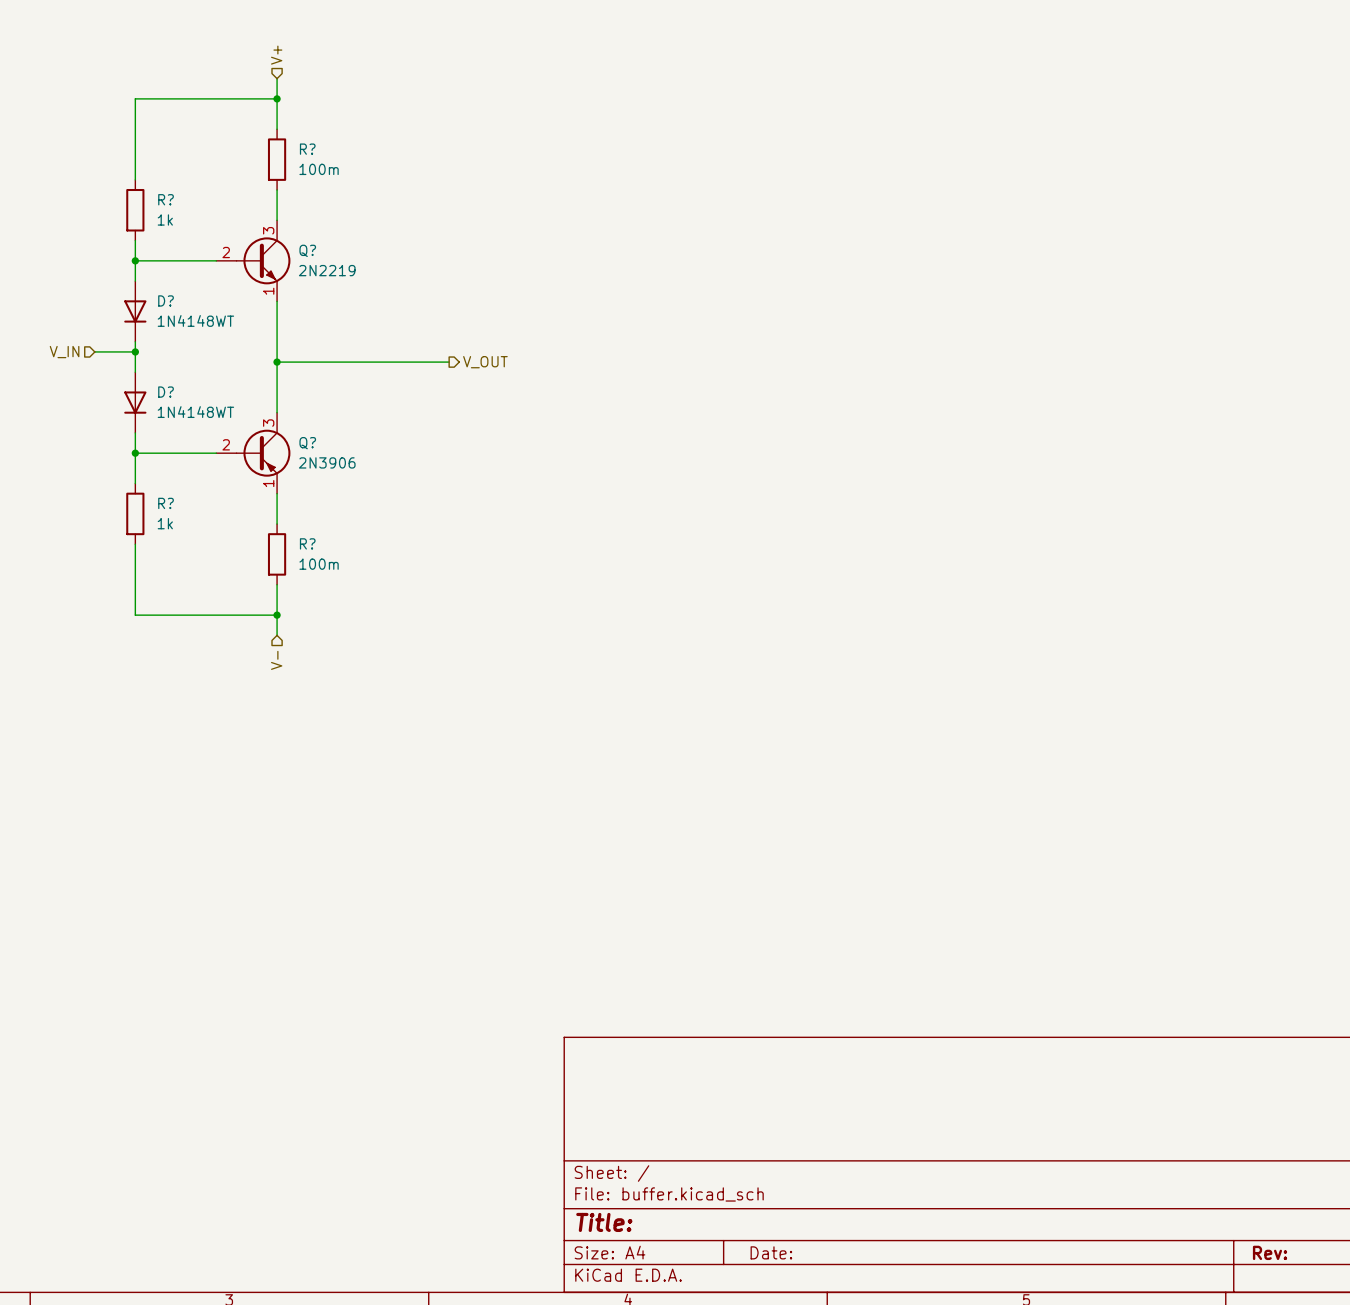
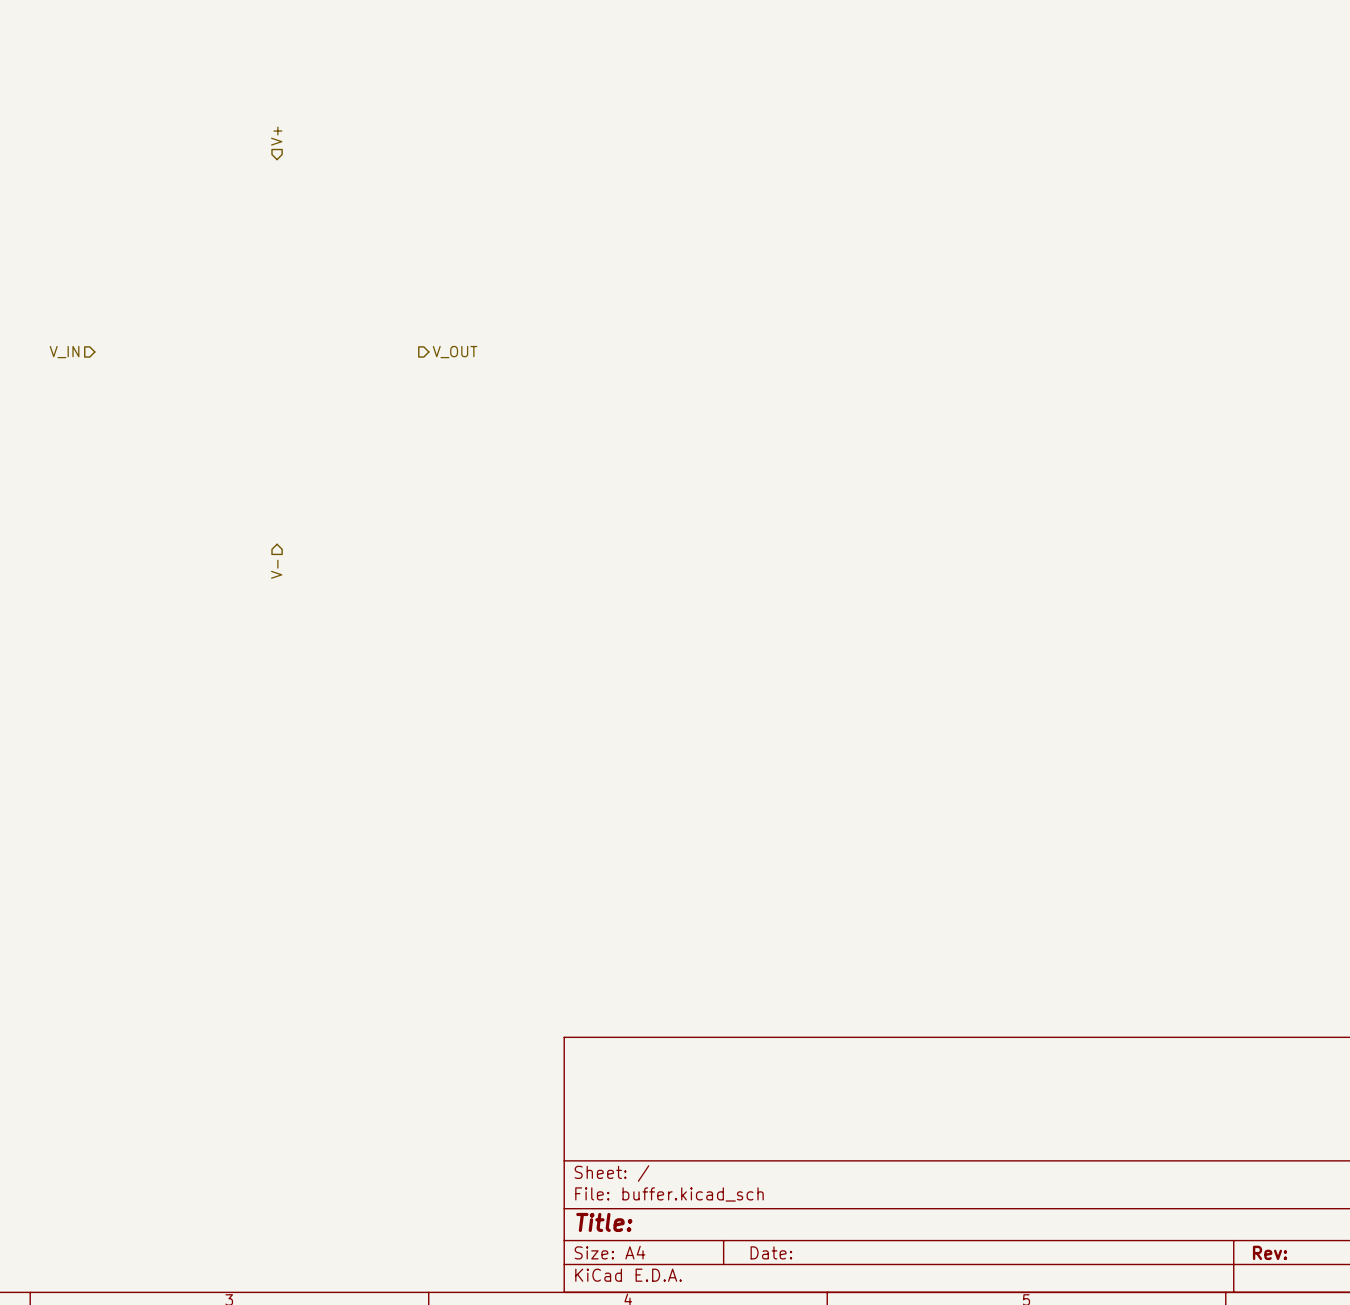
hierarchical label position: V+ (276, 55) -> V+ (276, 136)
wire: (277, 78) (277, 129) -> none
wire: (277, 98) (135, 98) (135, 179) -> none
junction: (277, 98) -> none
R?: 100m (277, 159) -> none
wire: (277, 190) (277, 220) -> none
R?: 1k (135, 210) -> none
wire: (135, 240) (135, 281) -> none
wire: (135, 260) (216, 260) -> none
junction: (135, 260) -> none
Q?: 2N2219 (253, 260) -> none
wire: (277, 301) (277, 412) -> none
D?: 1N4148WT (135, 311) -> none
wire: (135, 341) (135, 372) -> none
wire: (94, 351) (135, 351) -> none
junction: (135, 351) -> none
wire: (277, 362) (449, 362) -> none
junction: (277, 362) -> none
hierarchical label position: V_OUT (485, 362) -> V_OUT (455, 352)
D?: 1N4148WT (135, 402) -> none
wire: (135, 432) (135, 483) -> none
wire: (135, 453) (216, 453) -> none
junction: (135, 453) -> none
Q?: 2N3906 (253, 453) -> none
wire: (277, 493) (277, 524) -> none
R?: 1k (135, 513) -> none
wire: (135, 544) (135, 615) (277, 615) -> none
R?: 100m (277, 554) -> none
wire: (277, 584) (277, 635) -> none
junction: (277, 615) -> none
hierarchical label position: V- (276, 660) -> V- (276, 569)

